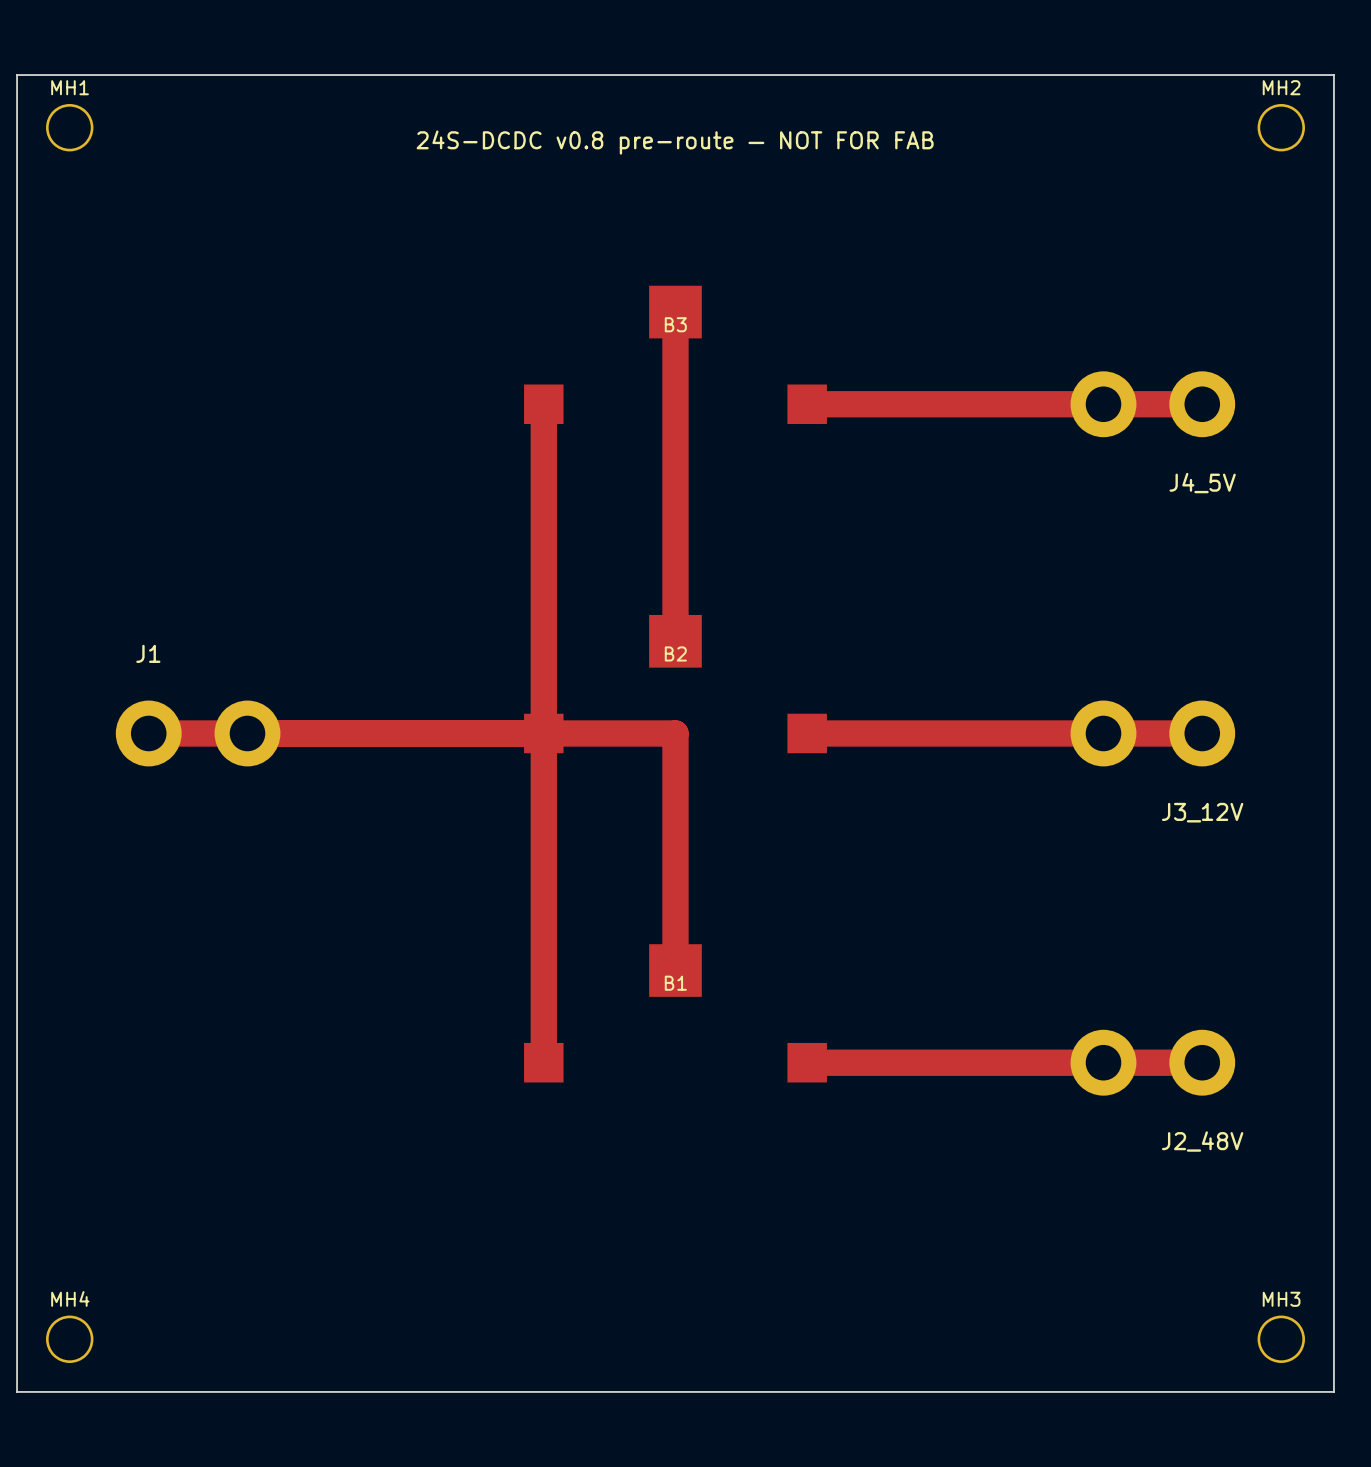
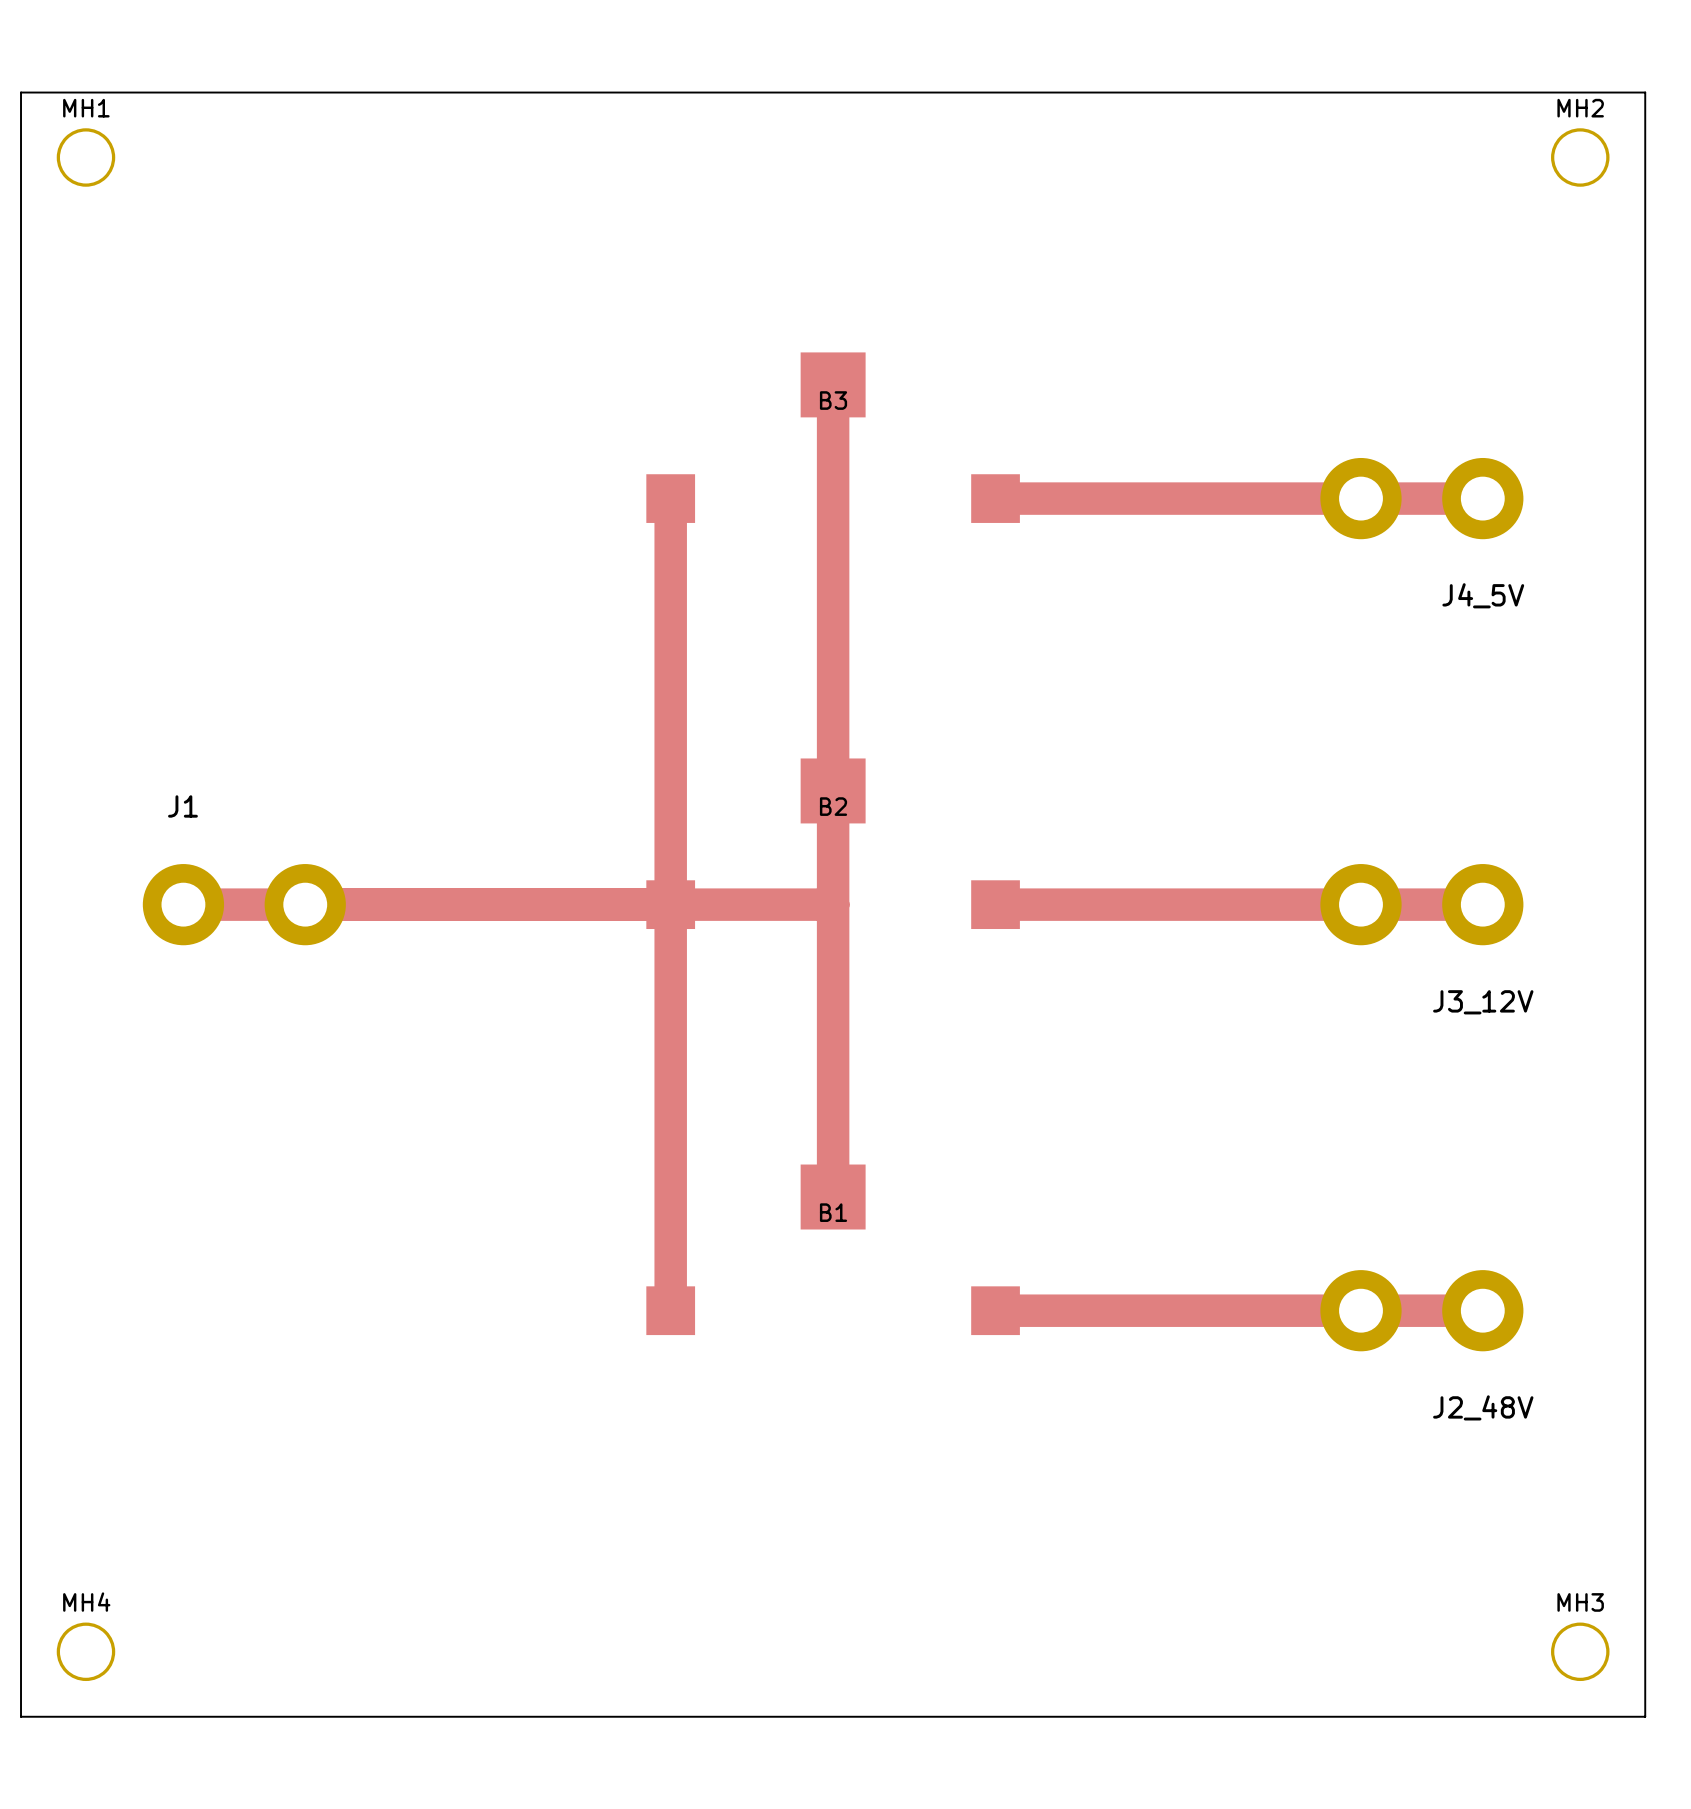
text: 24S-DCDC v0.8 pre-route — NOT FOR FAB (675, 142) -> none
track: none -> (833, 790) (833, 904)

